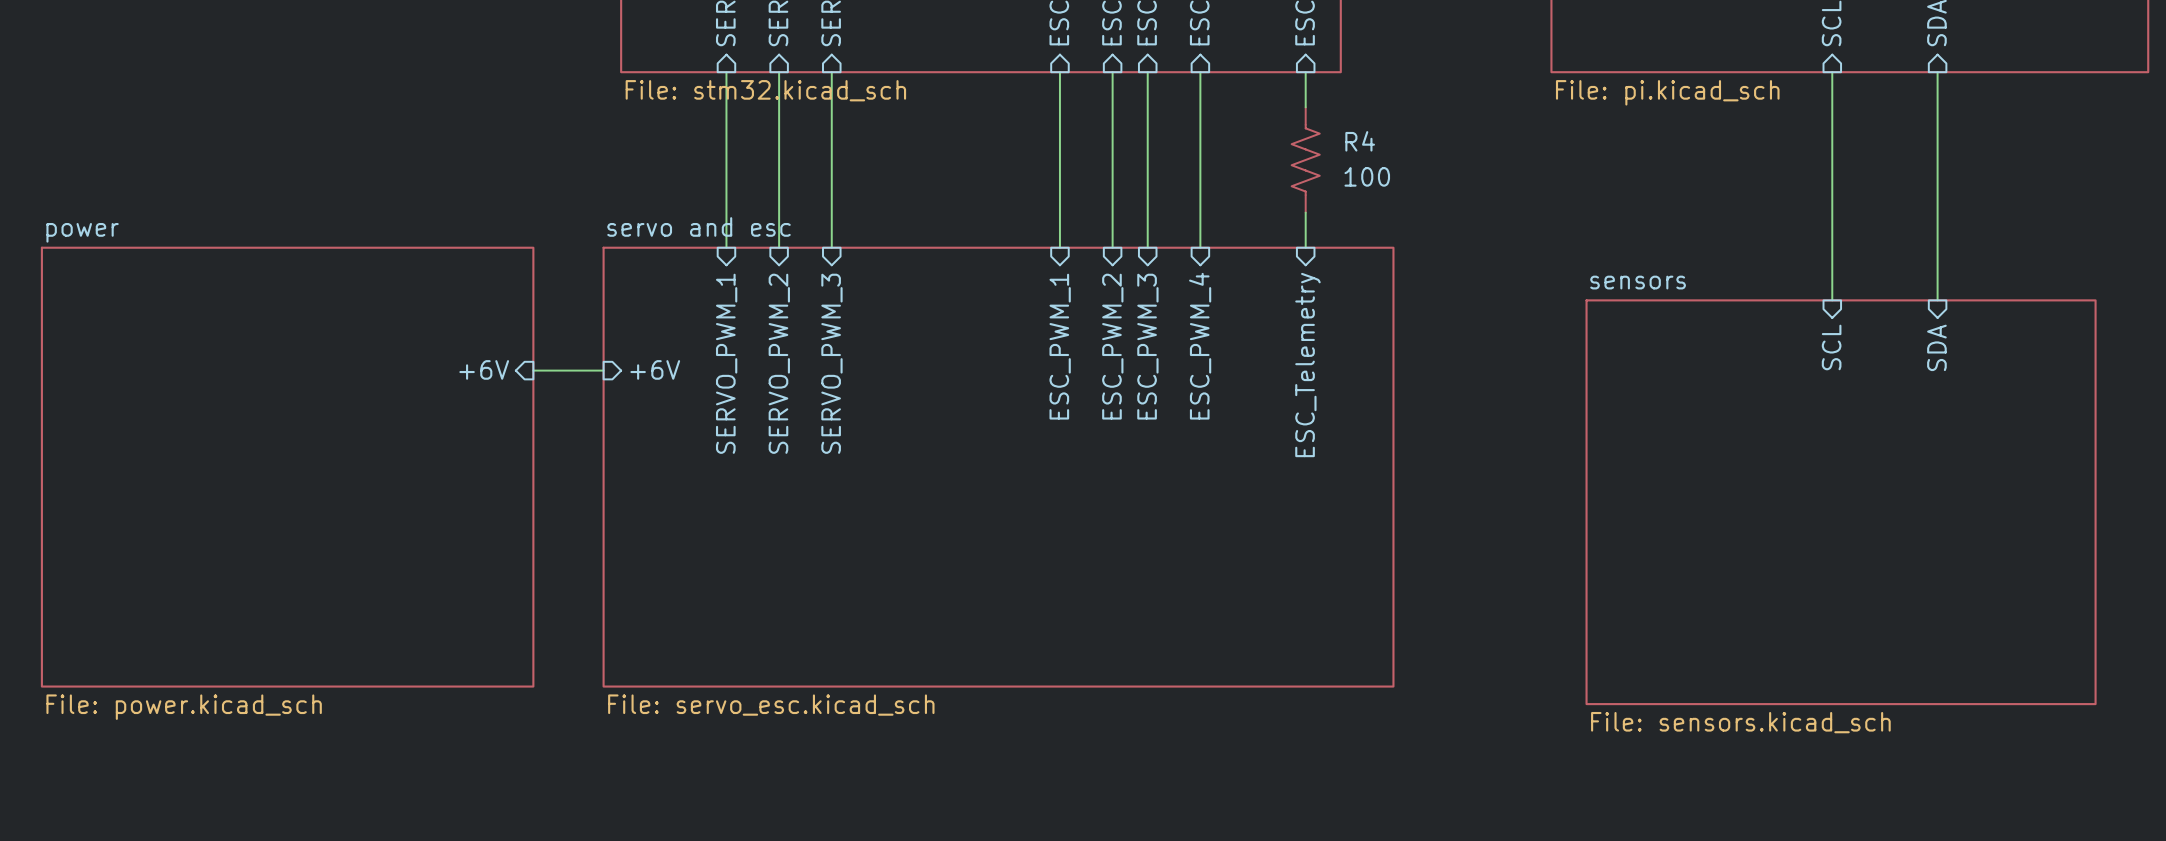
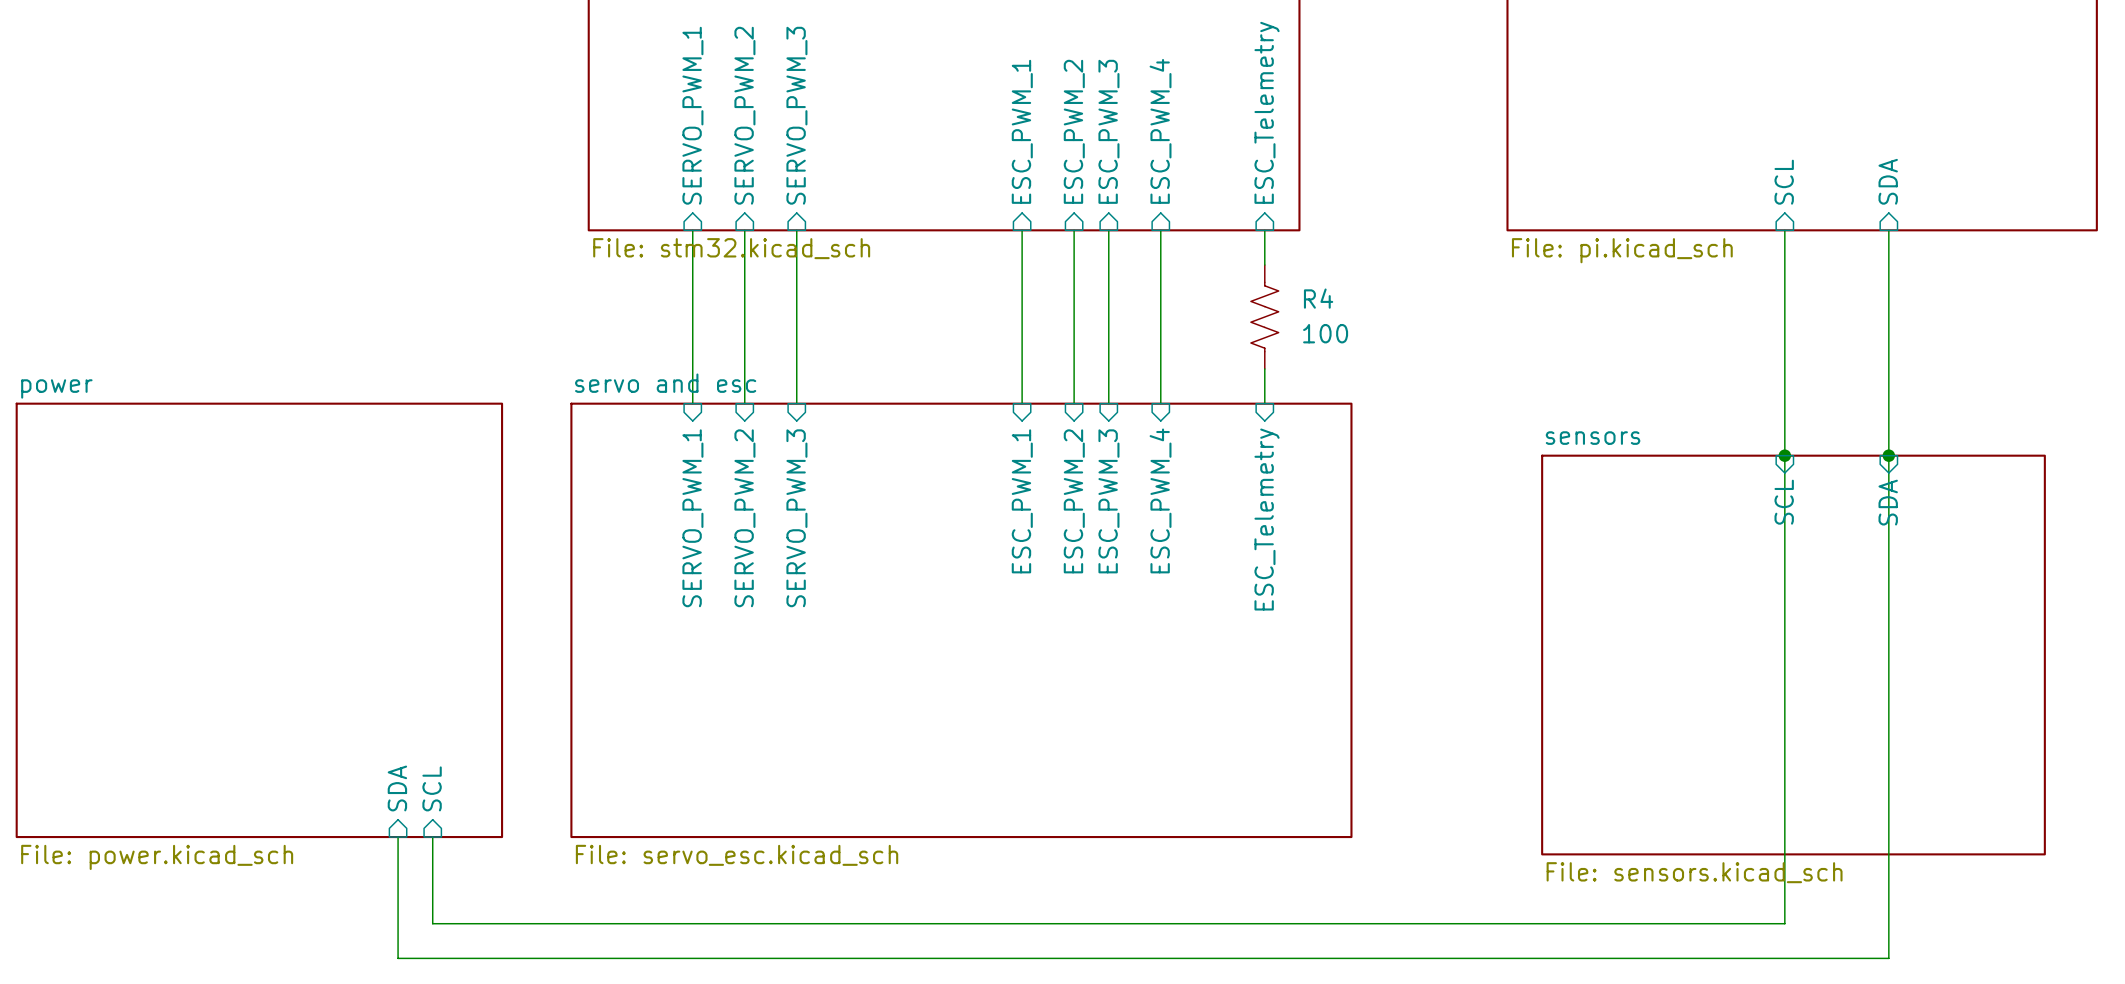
wire: none -> (1784, 455) (1784, 923) (432, 923) (432, 837)
junction: none -> (1784, 455)
wire: none -> (1888, 455) (1888, 958) (398, 958) (398, 837)
junction: none -> (1888, 455)
sheet pin: +6V (484, 369) -> none
sheet pin: +6V (655, 369) -> none
wire: (533, 370) (603, 370) -> none
sheet pin: none -> SDA (397, 788)
sheet pin: none -> SCL (432, 788)

